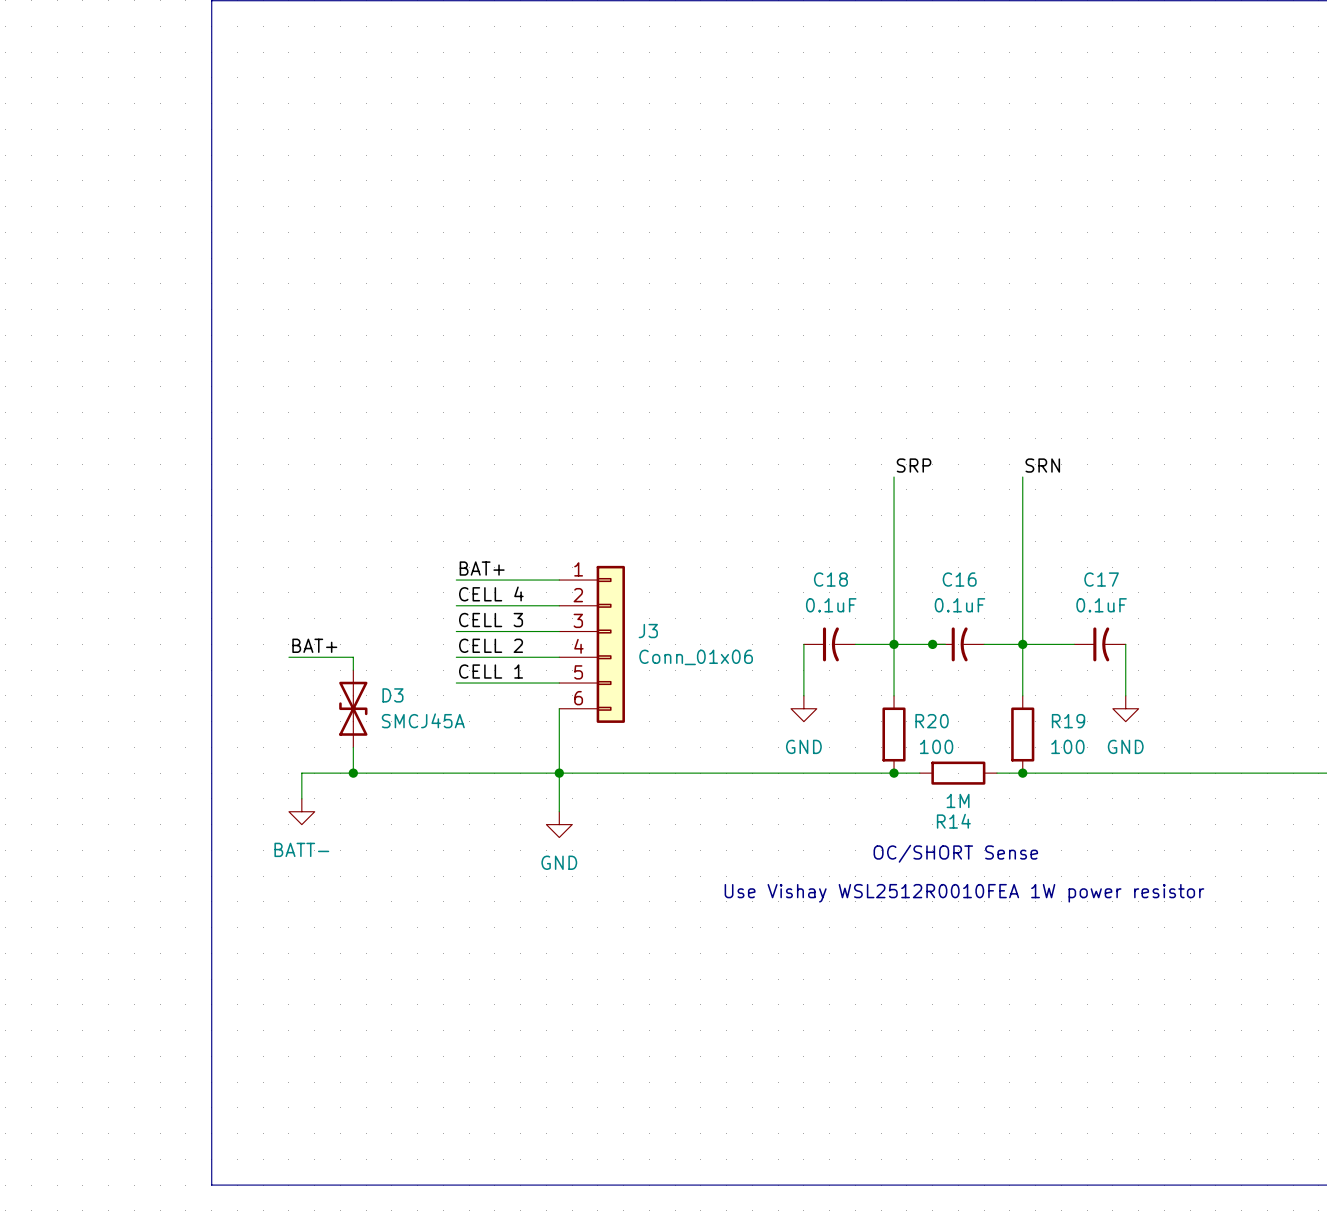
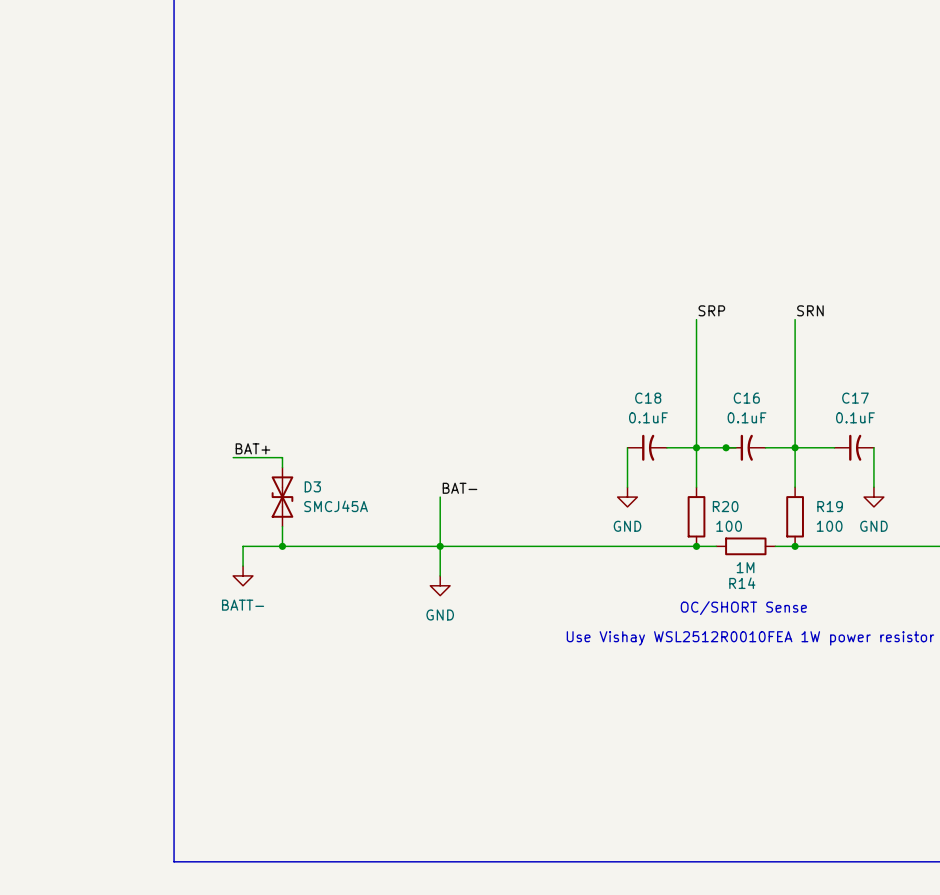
label: BAT+ (482, 568) -> none
wire: (456, 580) (559, 580) -> none
label: CELL 4 (491, 593) -> none
wire: (456, 605) (559, 605) -> none
label: CELL 3 (491, 620) -> none
wire: (456, 631) (559, 631) -> none
J3: Conn_01x06 (592, 644) -> none
label: CELL 2 (491, 645) -> none
wire: (456, 657) (559, 657) -> none
label: CELL 1 (491, 671) -> none
wire: (456, 683) (559, 683) -> none
label: none -> BAT- (459, 488)

